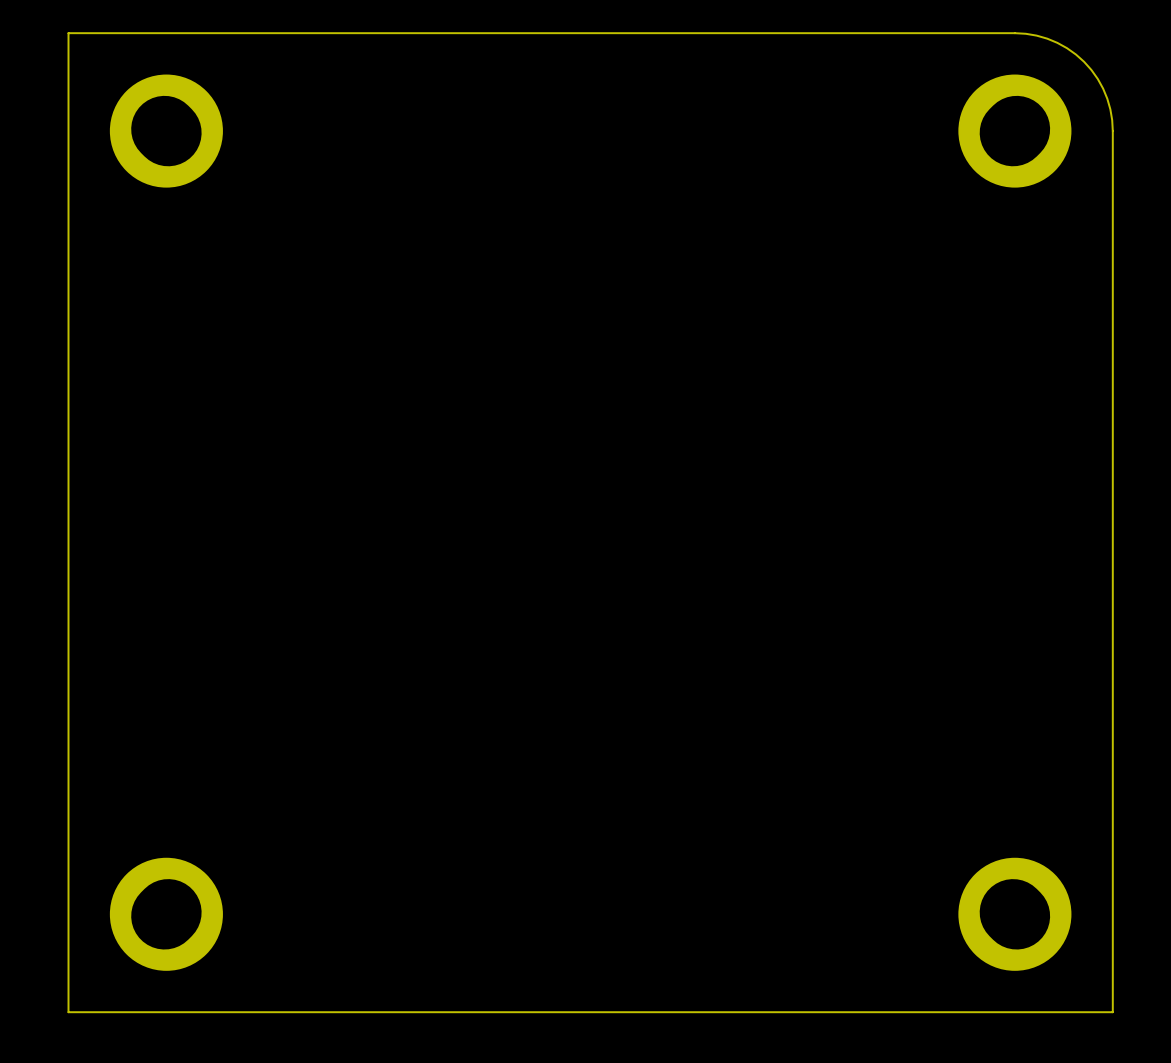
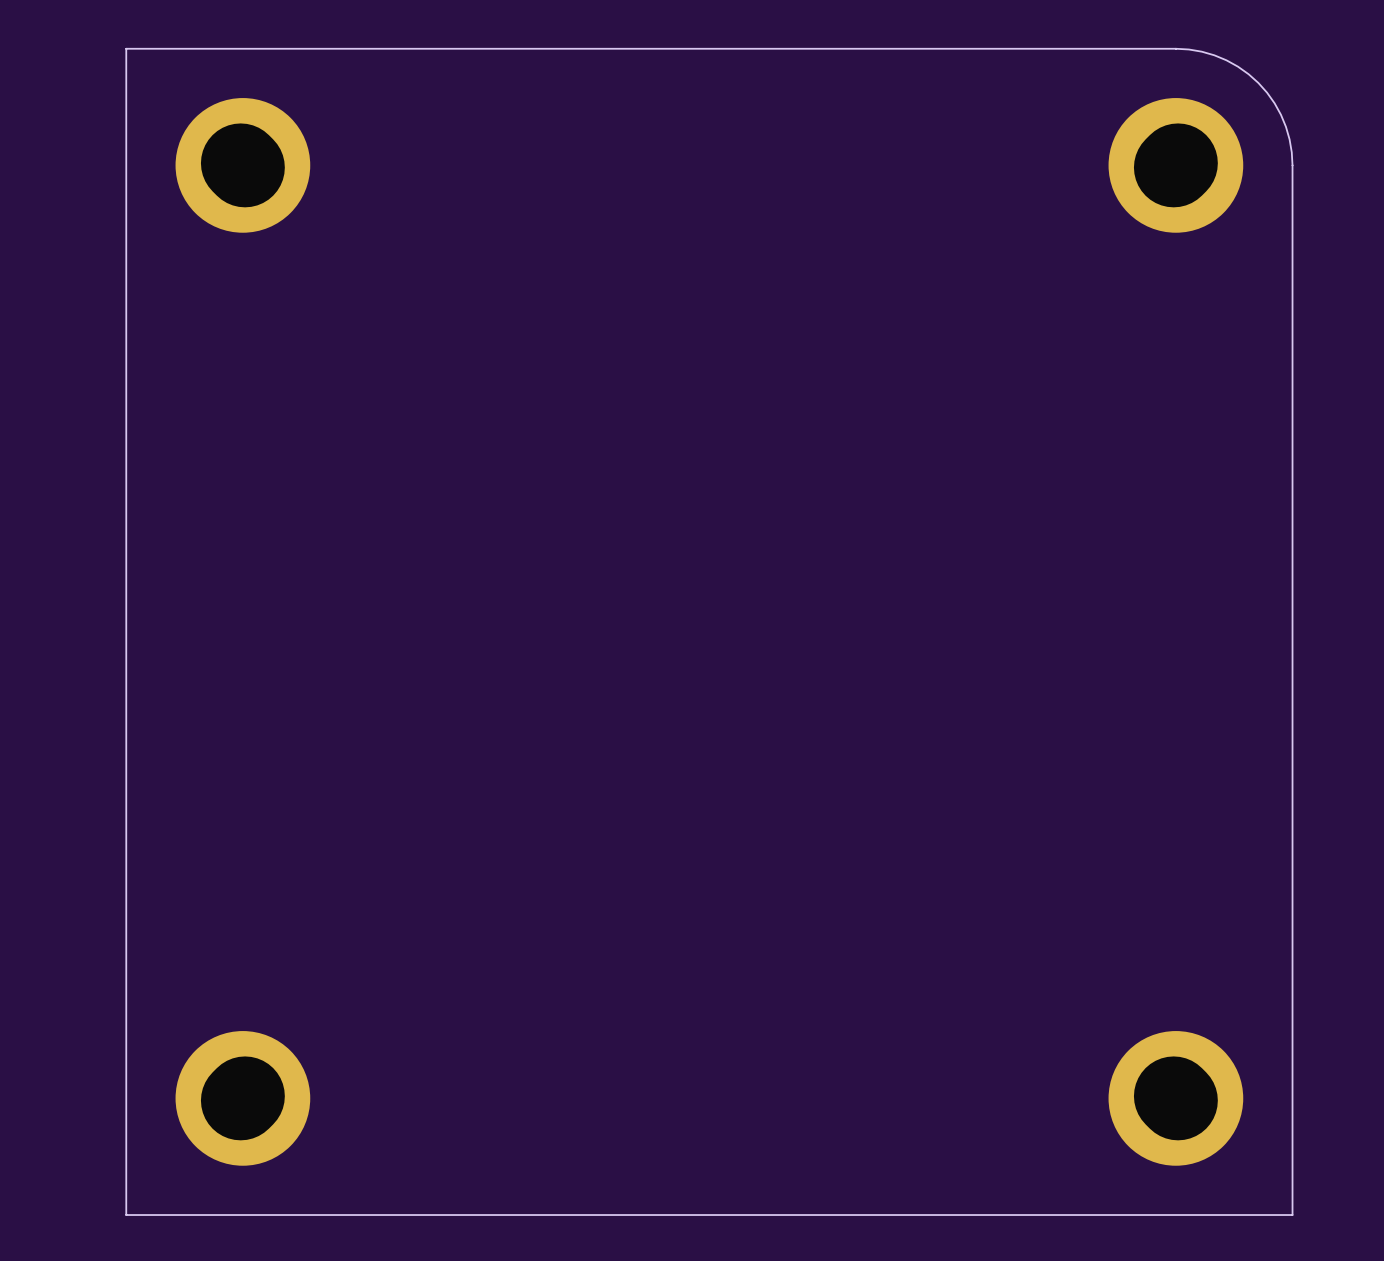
board edge: (133, 33) (68, 33) (68, 1012) (133, 1012) -> (126, 48) (126, 1215)
part position: (166, 131) -> (242, 165)
part position: (166, 914) -> (242, 1098)

